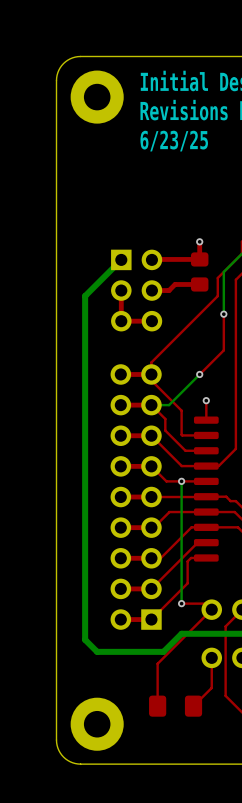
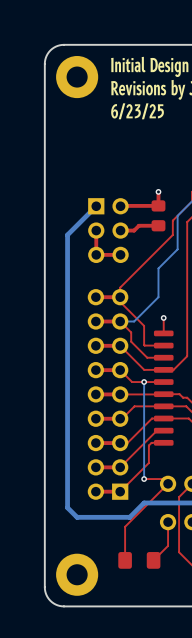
top track: (223, 314) (223, 350) (199, 374) -> none
bottom track: none -> (177, 249) (158, 268) (158, 297)
via: (223, 314) -> none
via: (199, 374) -> none

